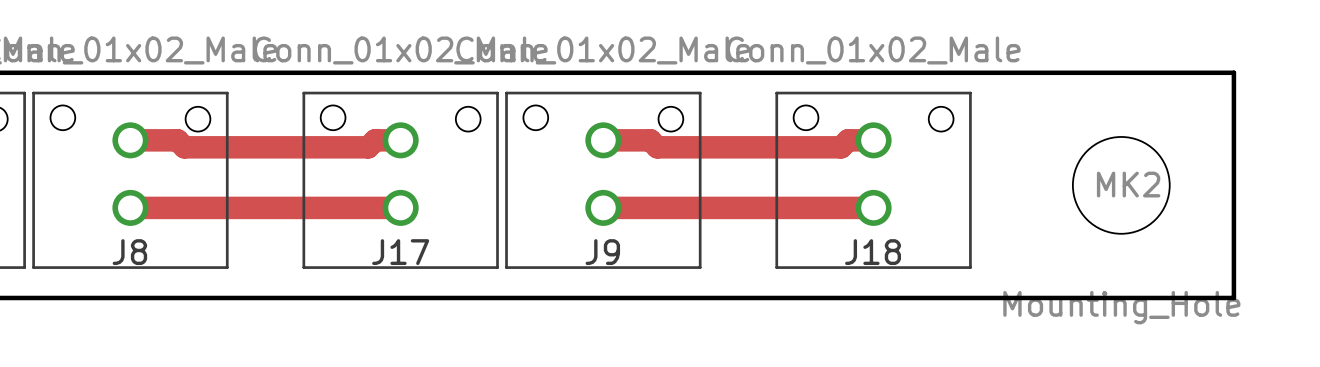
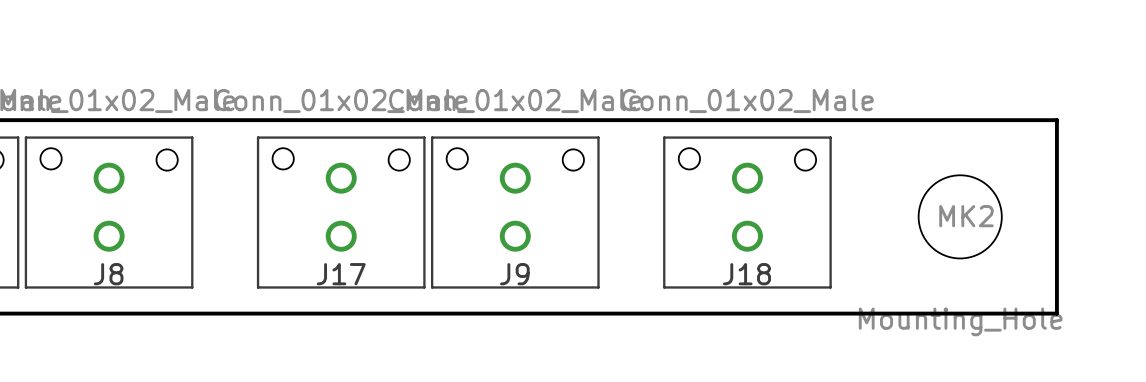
top track: (130, 140) (177, 140) (184, 147) (368, 147) (375, 140) (400, 140) -> none
top track: (603, 140) (650, 140) (657, 147) (841, 147) (848, 140) (873, 140) -> none
top track: (130, 207) (400, 207) -> none
top track: (603, 207) (873, 207) -> none

